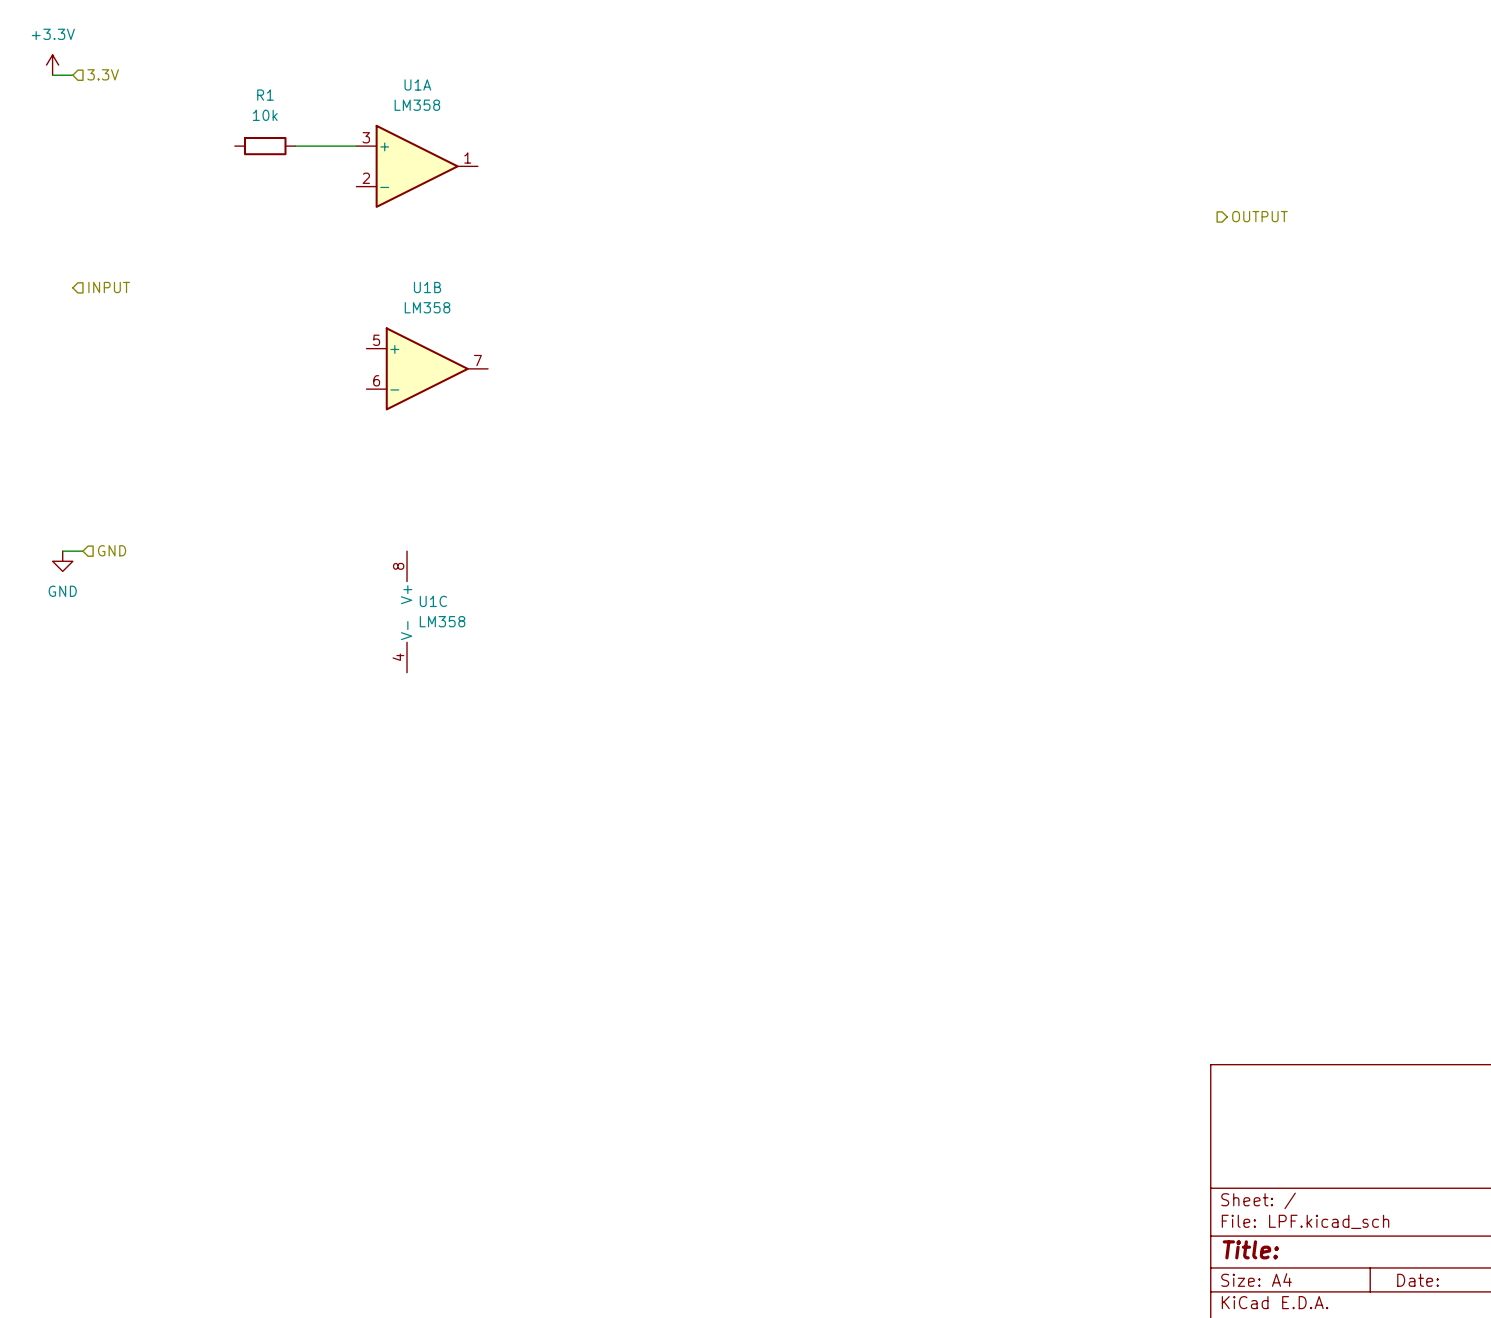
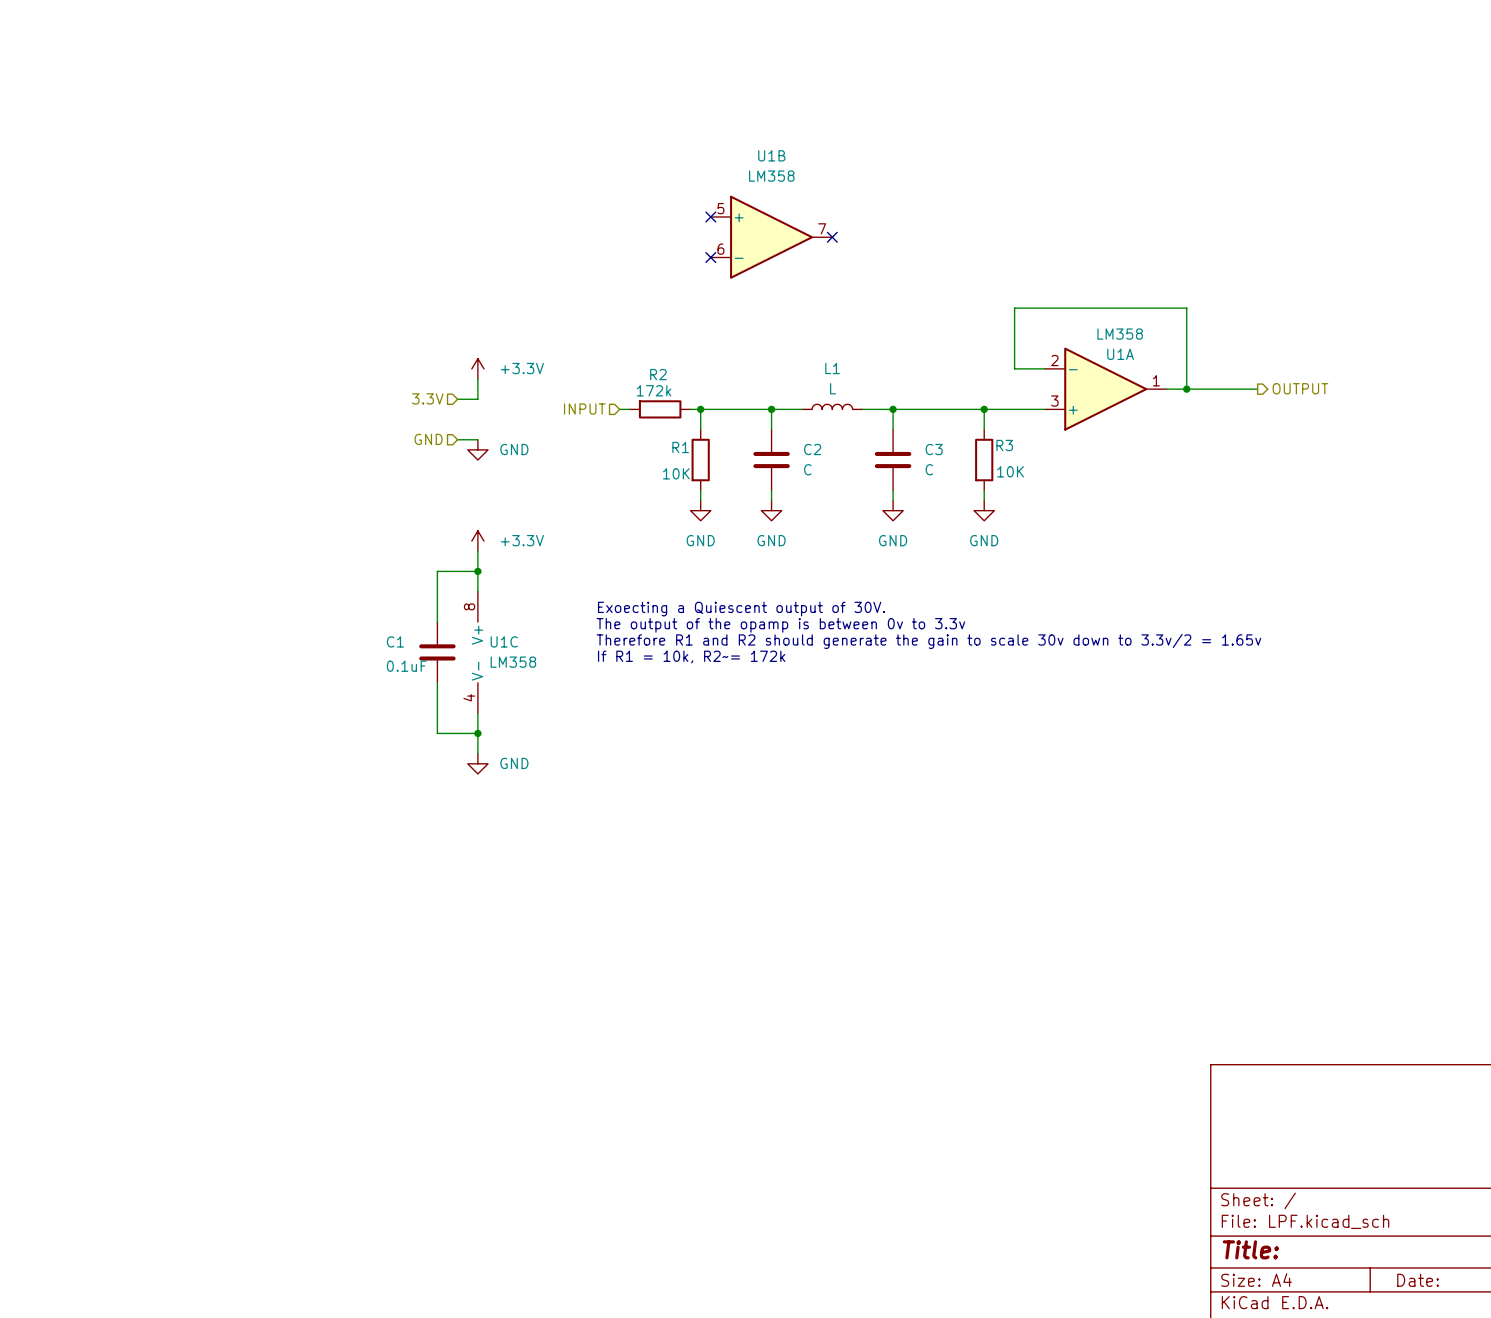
power symbol: +3.3V (52, 65) -> none
hierarchical label: 3.3V (103, 74) -> none
wire: (52, 75) (72, 75) -> none
U1A name position: U1A (417, 84) -> U1A (1120, 354)
R1 name position: R1 (265, 95) -> R1 (680, 447)
R1 value: 10k (265, 115) -> 10K (676, 473)
R1 rotation: 0° (265, 146) -> 90° clockwise (700, 460)
R1 position: (265, 146) -> (700, 460)
wire: (295, 146) (356, 146) -> none
U1A flip: as is (417, 166) -> up-down (1105, 389)
U1A position: (417, 166) -> (1105, 389)
no-connect mark: none -> (710, 216)
hierarchical label position: OUTPUT (1259, 216) -> OUTPUT (1300, 388)
no-connect mark: none -> (832, 237)
no-connect mark: none -> (710, 257)
hierarchical label: INPUT (109, 287) -> none
U1B position: (427, 368) -> (771, 237)
power symbol: none -> +3.3V (477, 368)
wire: none -> (1044, 368) (1014, 368) (1014, 308) (1186, 308) (1186, 389)
wire: none -> (477, 379) (477, 399) (457, 399)
wire: none -> (1166, 389) (1257, 389)
junction: none -> (1186, 389)
hierarchical label: none -> 3.3V (427, 398)
L1: none -> L (832, 406)
hierarchical label: none -> INPUT (584, 409)
wire: none -> (619, 409) (629, 409)
R2: none -> 172k (660, 409)
wire: none -> (690, 409) (801, 409)
wire: none -> (700, 409) (700, 429)
junction: none -> (700, 409)
wire: none -> (771, 409) (771, 429)
junction: none -> (771, 409)
wire: none -> (862, 409) (1044, 409)
wire: none -> (893, 409) (893, 429)
junction: none -> (893, 409)
wire: none -> (984, 409) (984, 429)
junction: none -> (984, 409)
hierarchical label: none -> GND (428, 439)
wire: none -> (457, 439) (477, 439)
power symbol: none -> GND (477, 449)
C2: none -> C (771, 460)
C3: none -> C (893, 460)
R3: none -> 10K (984, 460)
wire: none -> (700, 490) (700, 500)
wire: none -> (771, 490) (771, 500)
wire: none -> (893, 490) (893, 500)
wire: none -> (984, 490) (984, 500)
power symbol: none -> GND (700, 510)
power symbol: none -> GND (771, 510)
power symbol: none -> GND (893, 510)
power symbol: none -> GND (984, 510)
power symbol: none -> +3.3V (477, 541)
hierarchical label: GND (112, 550) -> none
wire: (62, 551) (82, 551) -> none
wire: none -> (477, 551) (477, 591)
power symbol: GND (62, 561) -> none
wire: none -> (477, 571) (437, 571) (437, 622)
junction: none -> (477, 571)
text: none -> Exoecting a Quiescent output of 30V. (741, 609)
U1C position: (407, 611) -> (477, 652)
text: none -> The output of the opamp is between 0v to 3.3v (780, 625)
text: none -> Therefore R1 and R2 should generate the gain to scale 30v down to 3.3v/2 = 1.65v (928, 641)
C1: none -> 0.1uF (437, 652)
text: none -> If R1 = 10k, R2~= 172k (691, 657)
wire: none -> (437, 682) (437, 733) (477, 733)
wire: none -> (477, 713) (477, 753)
junction: none -> (477, 733)
power symbol: none -> GND (477, 763)

